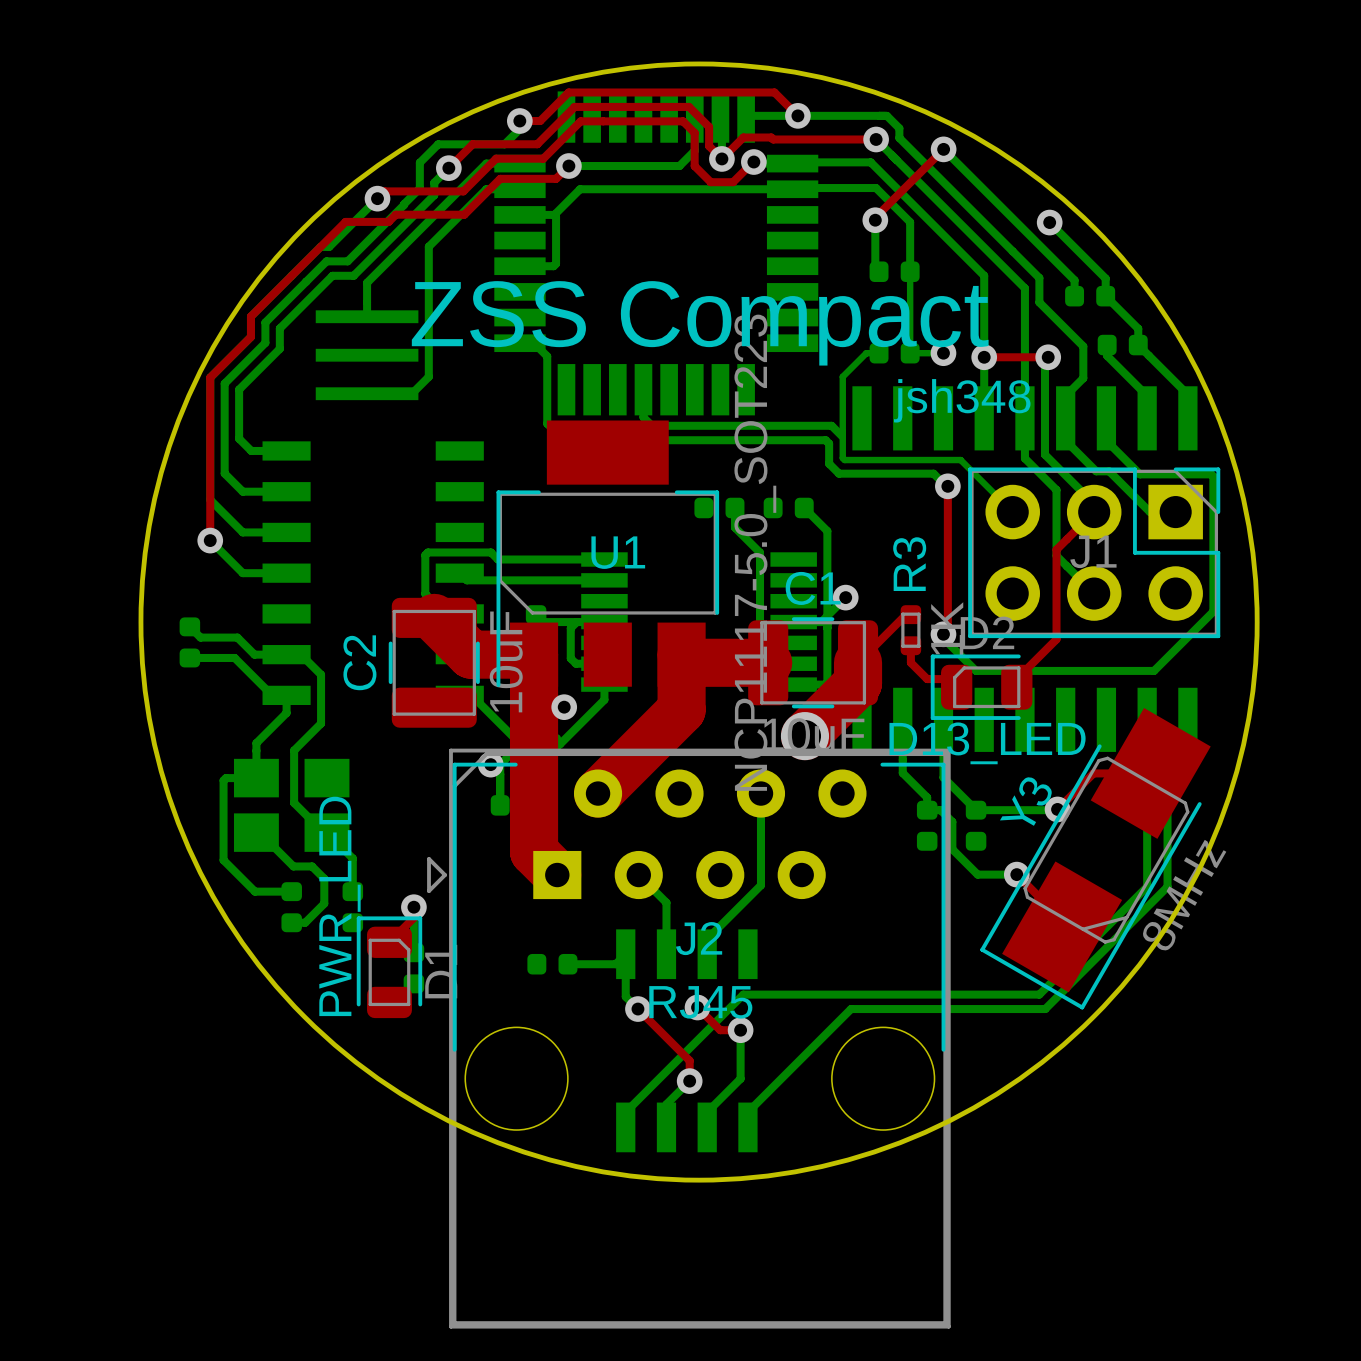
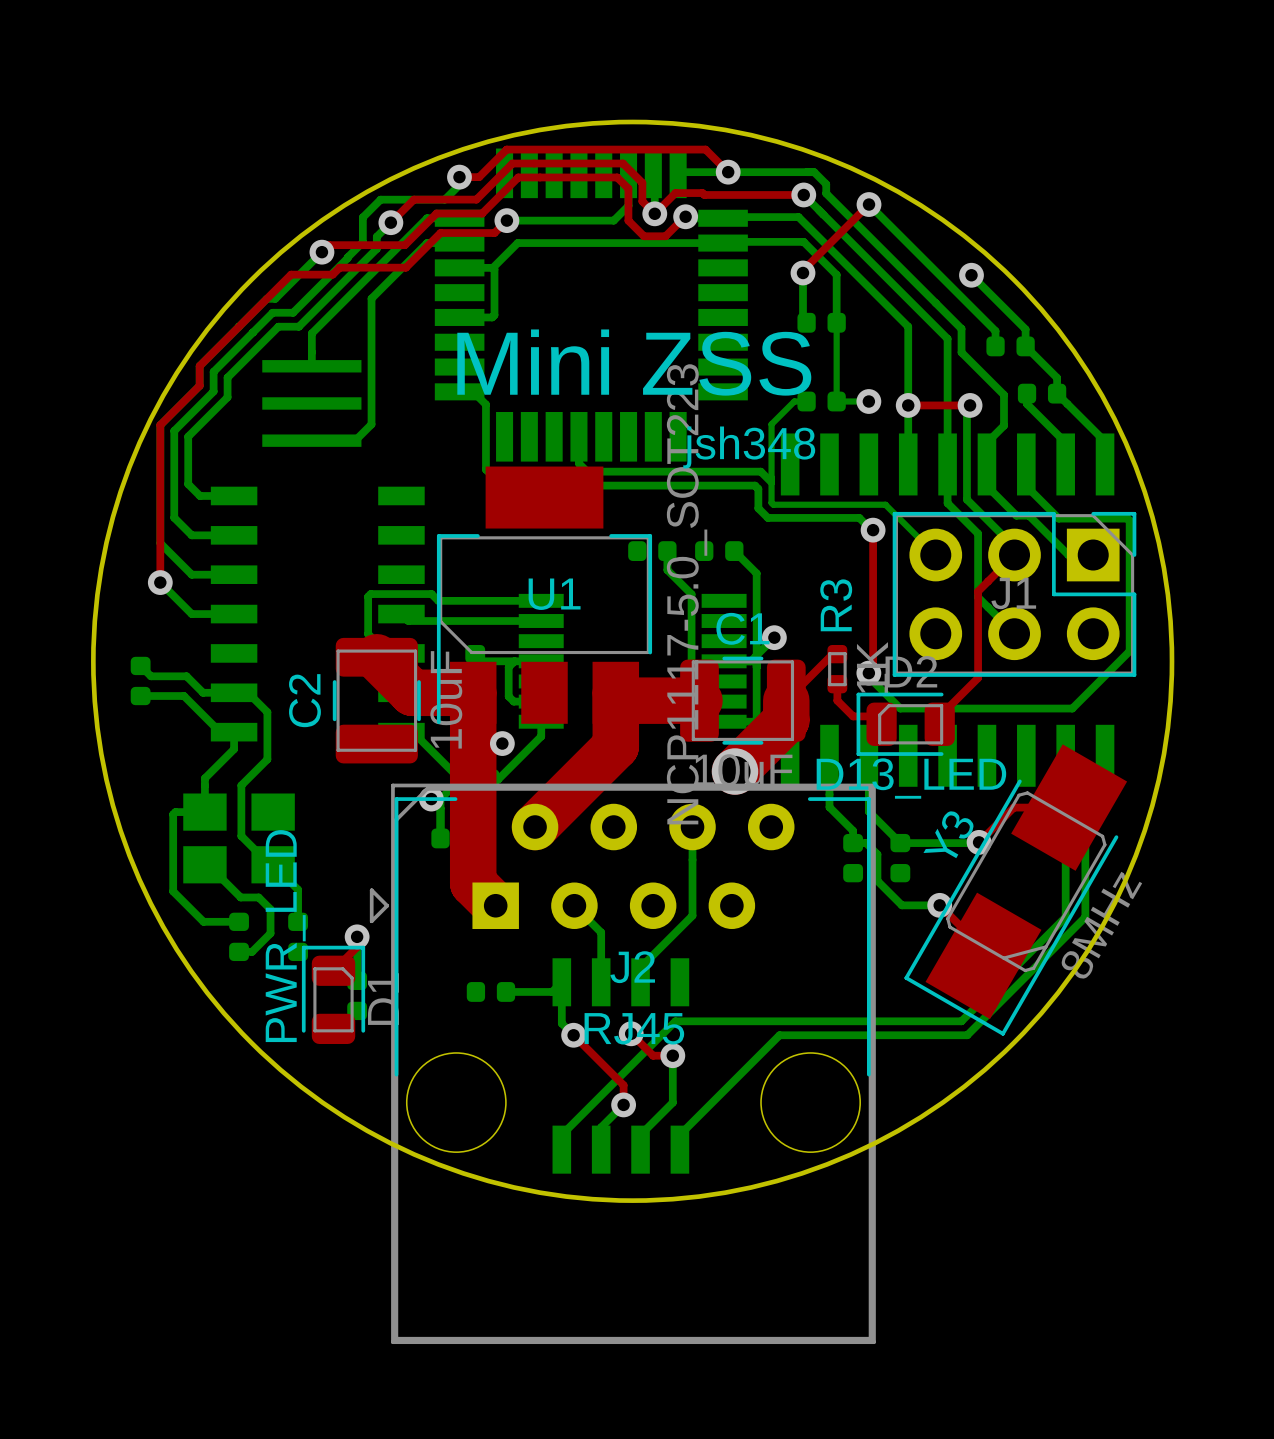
text: ZSS Compact (700, 323) -> Mini ZSS (634, 362)
text position: jsh348 (962, 400) -> jsh348 (749, 447)

